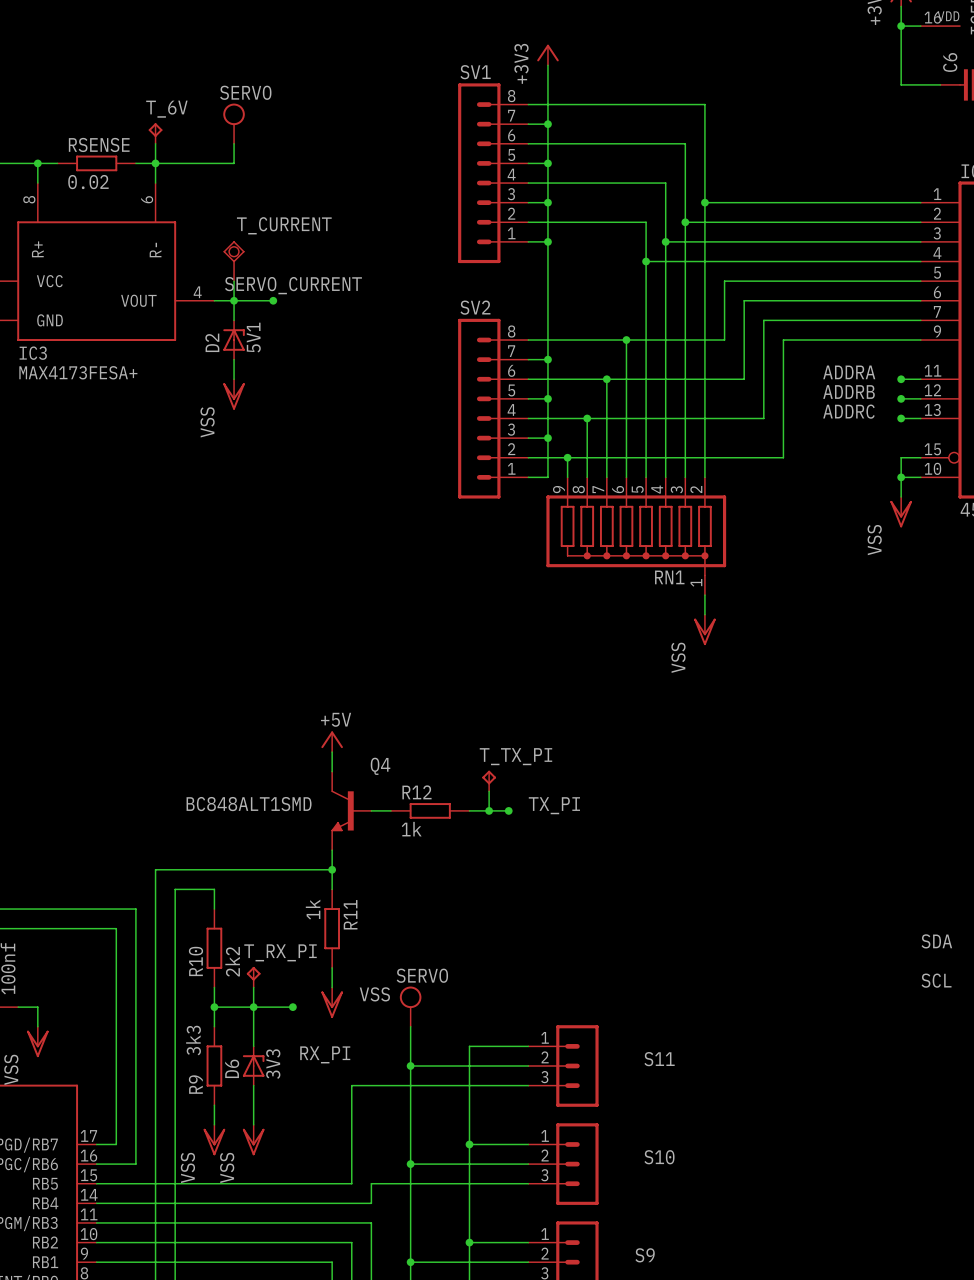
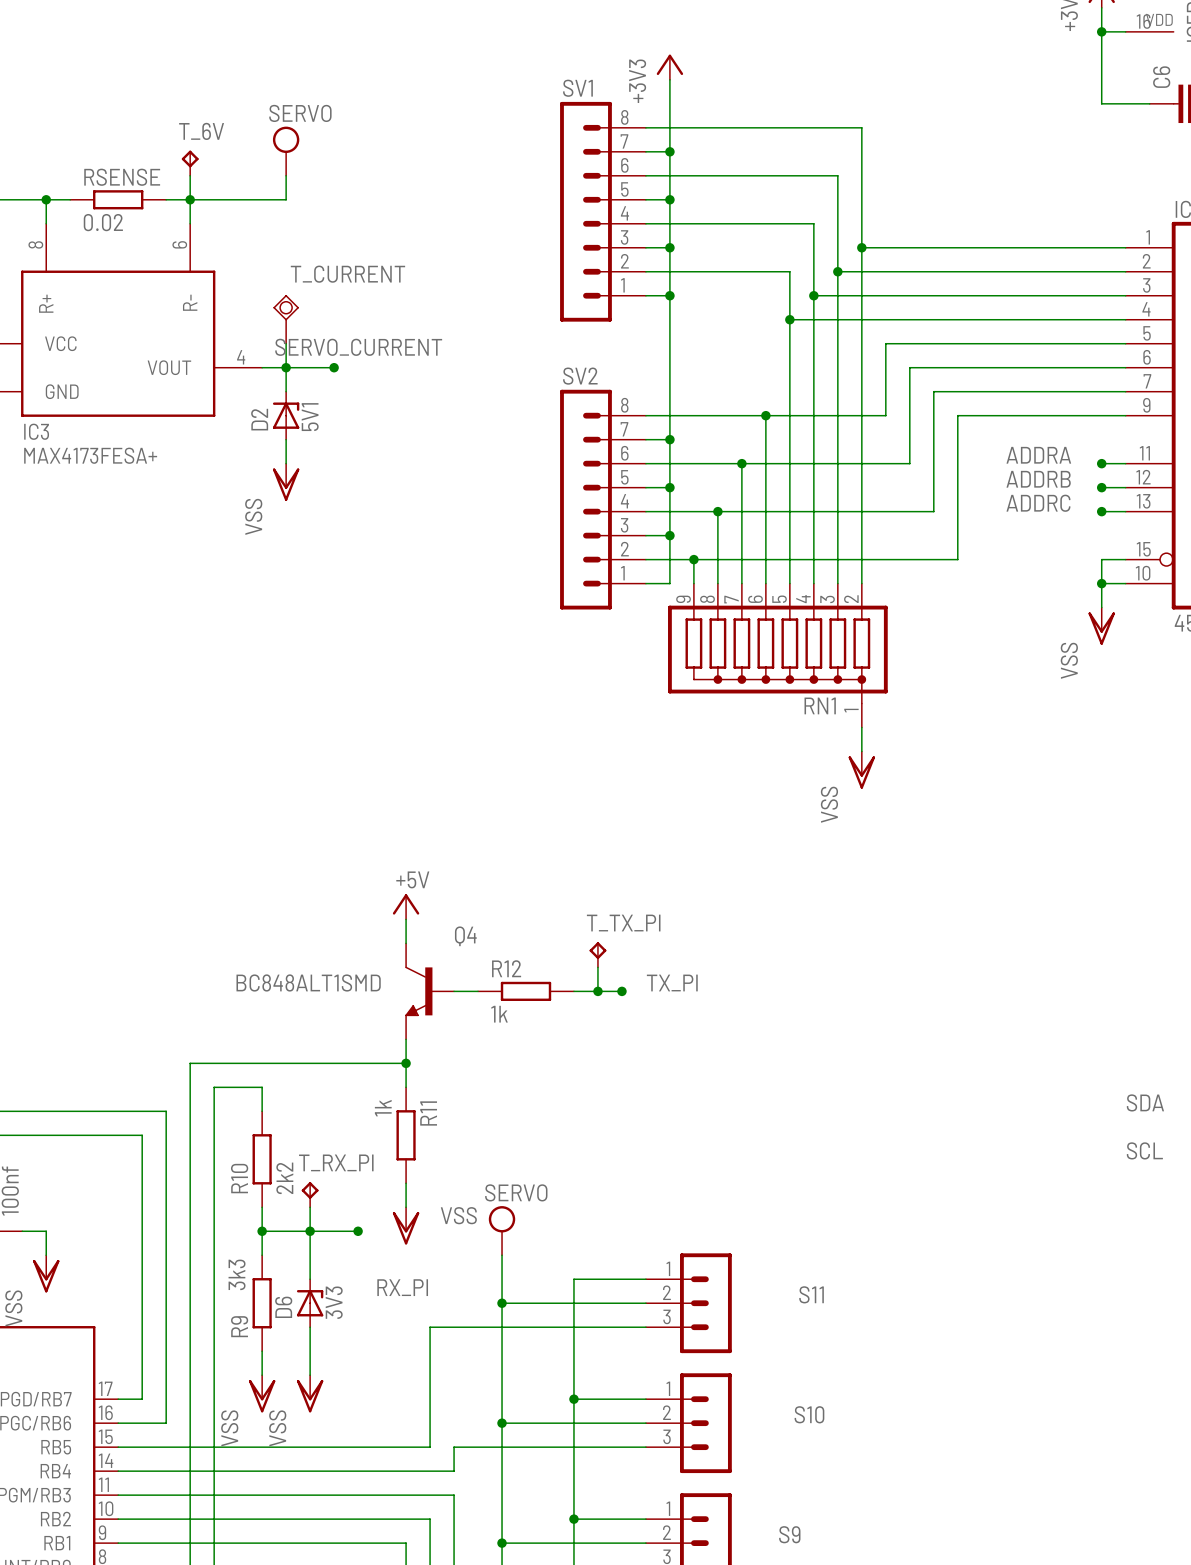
label: none -> SDA (1145, 1102)
label: SDA (936, 941) -> SCL (1144, 1150)
label: SCL (936, 980) -> none

